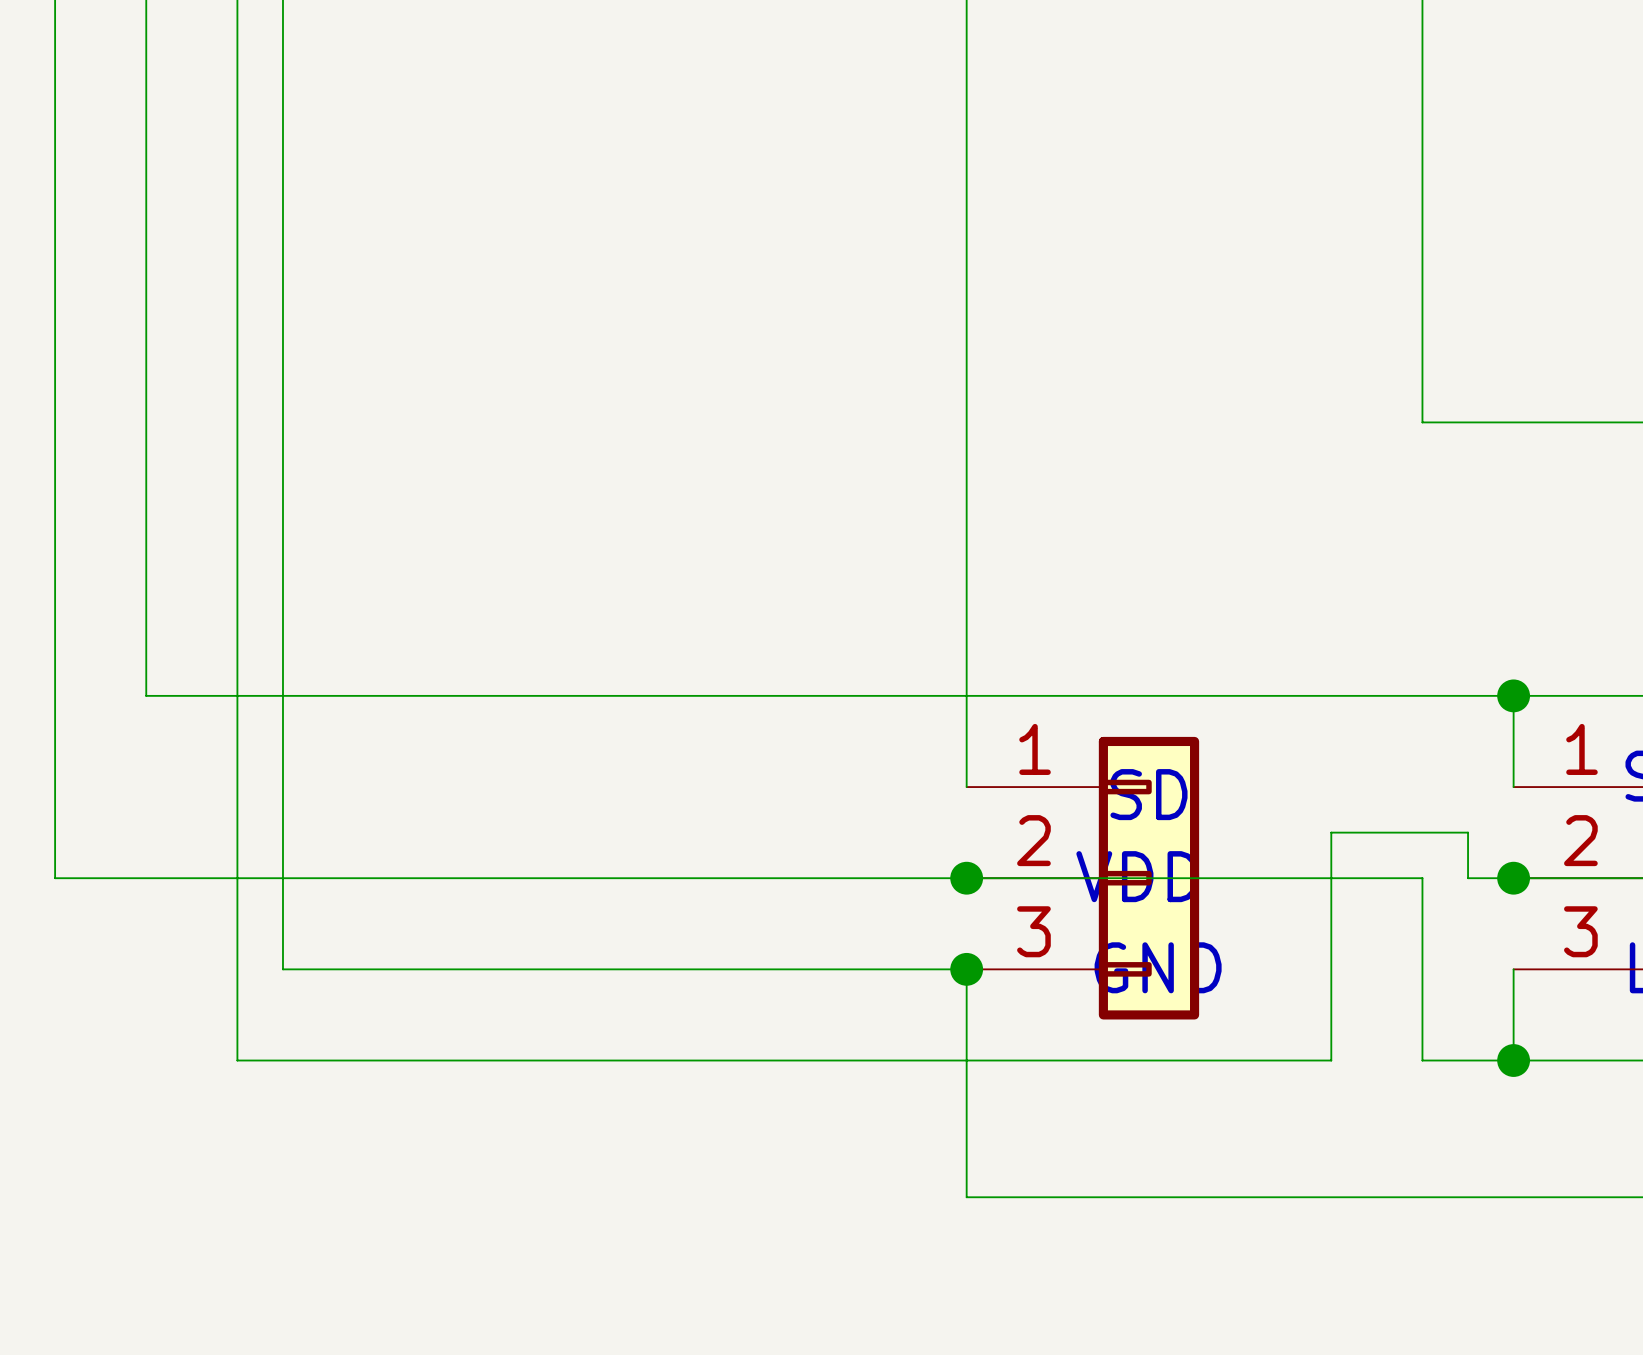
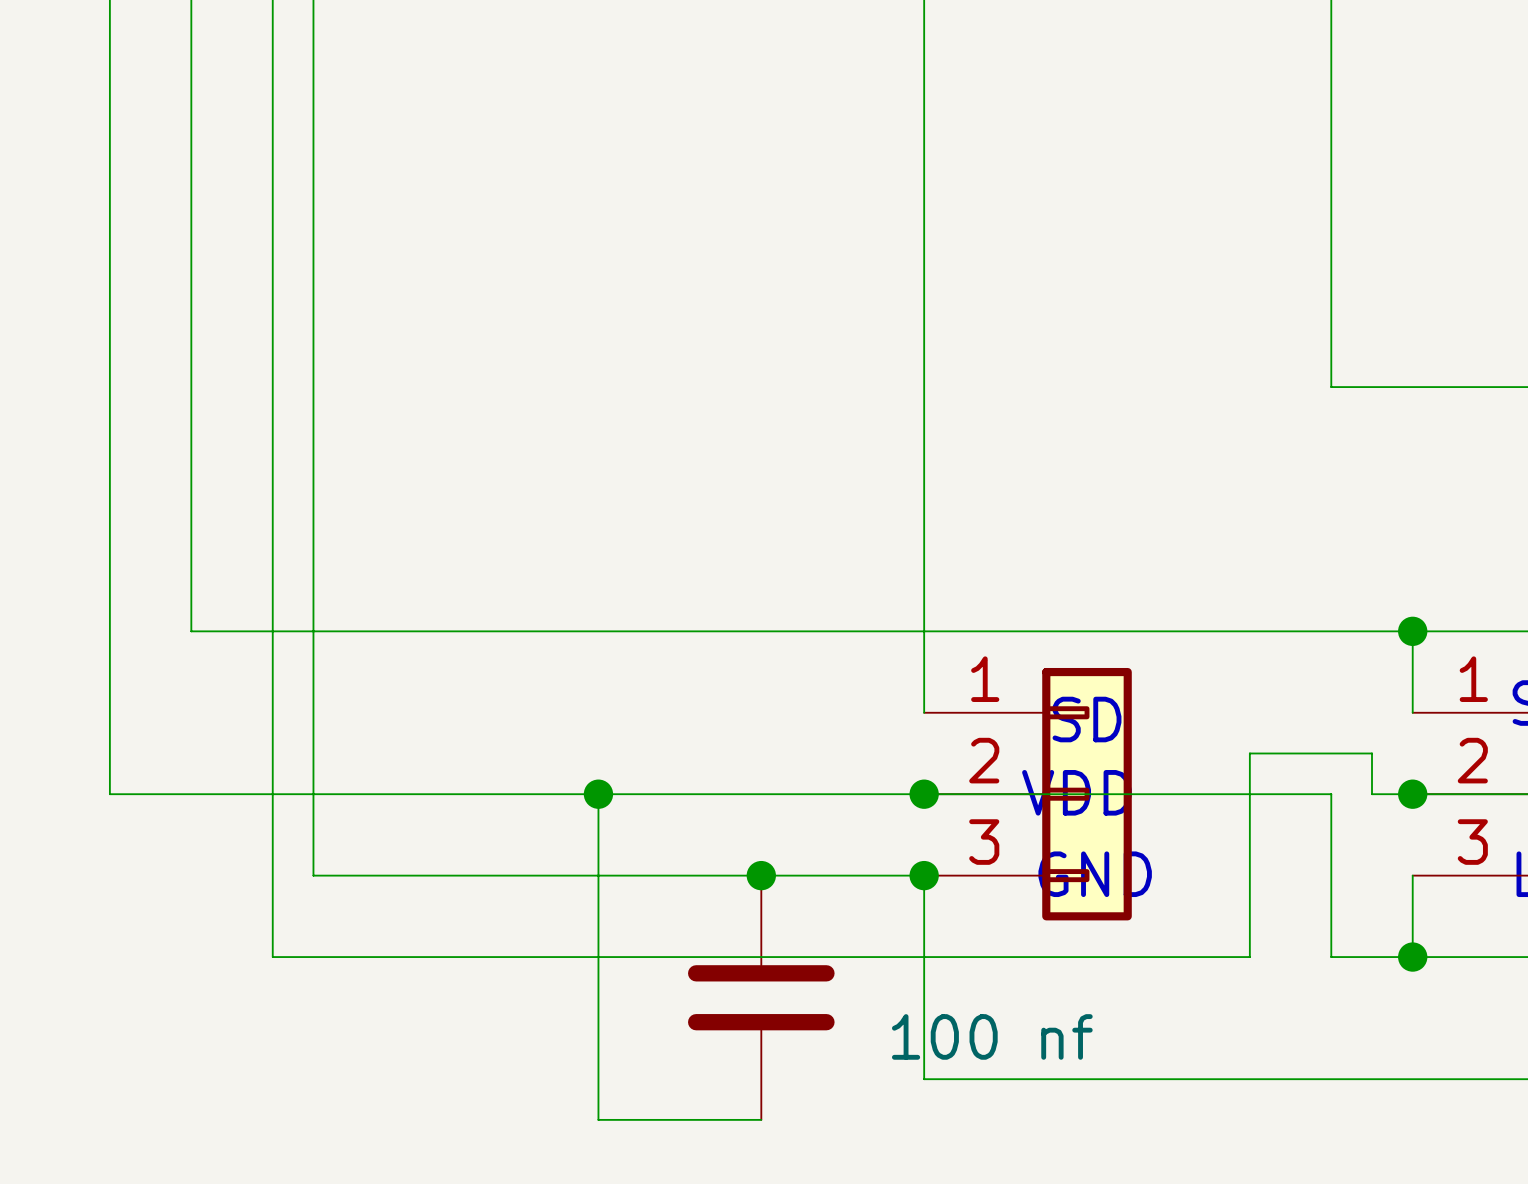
wire: none -> (598, 794) (598, 1119) (761, 1119)
junction: none -> (598, 794)
junction: none -> (761, 875)
part: none -> 100 nf (761, 997)

